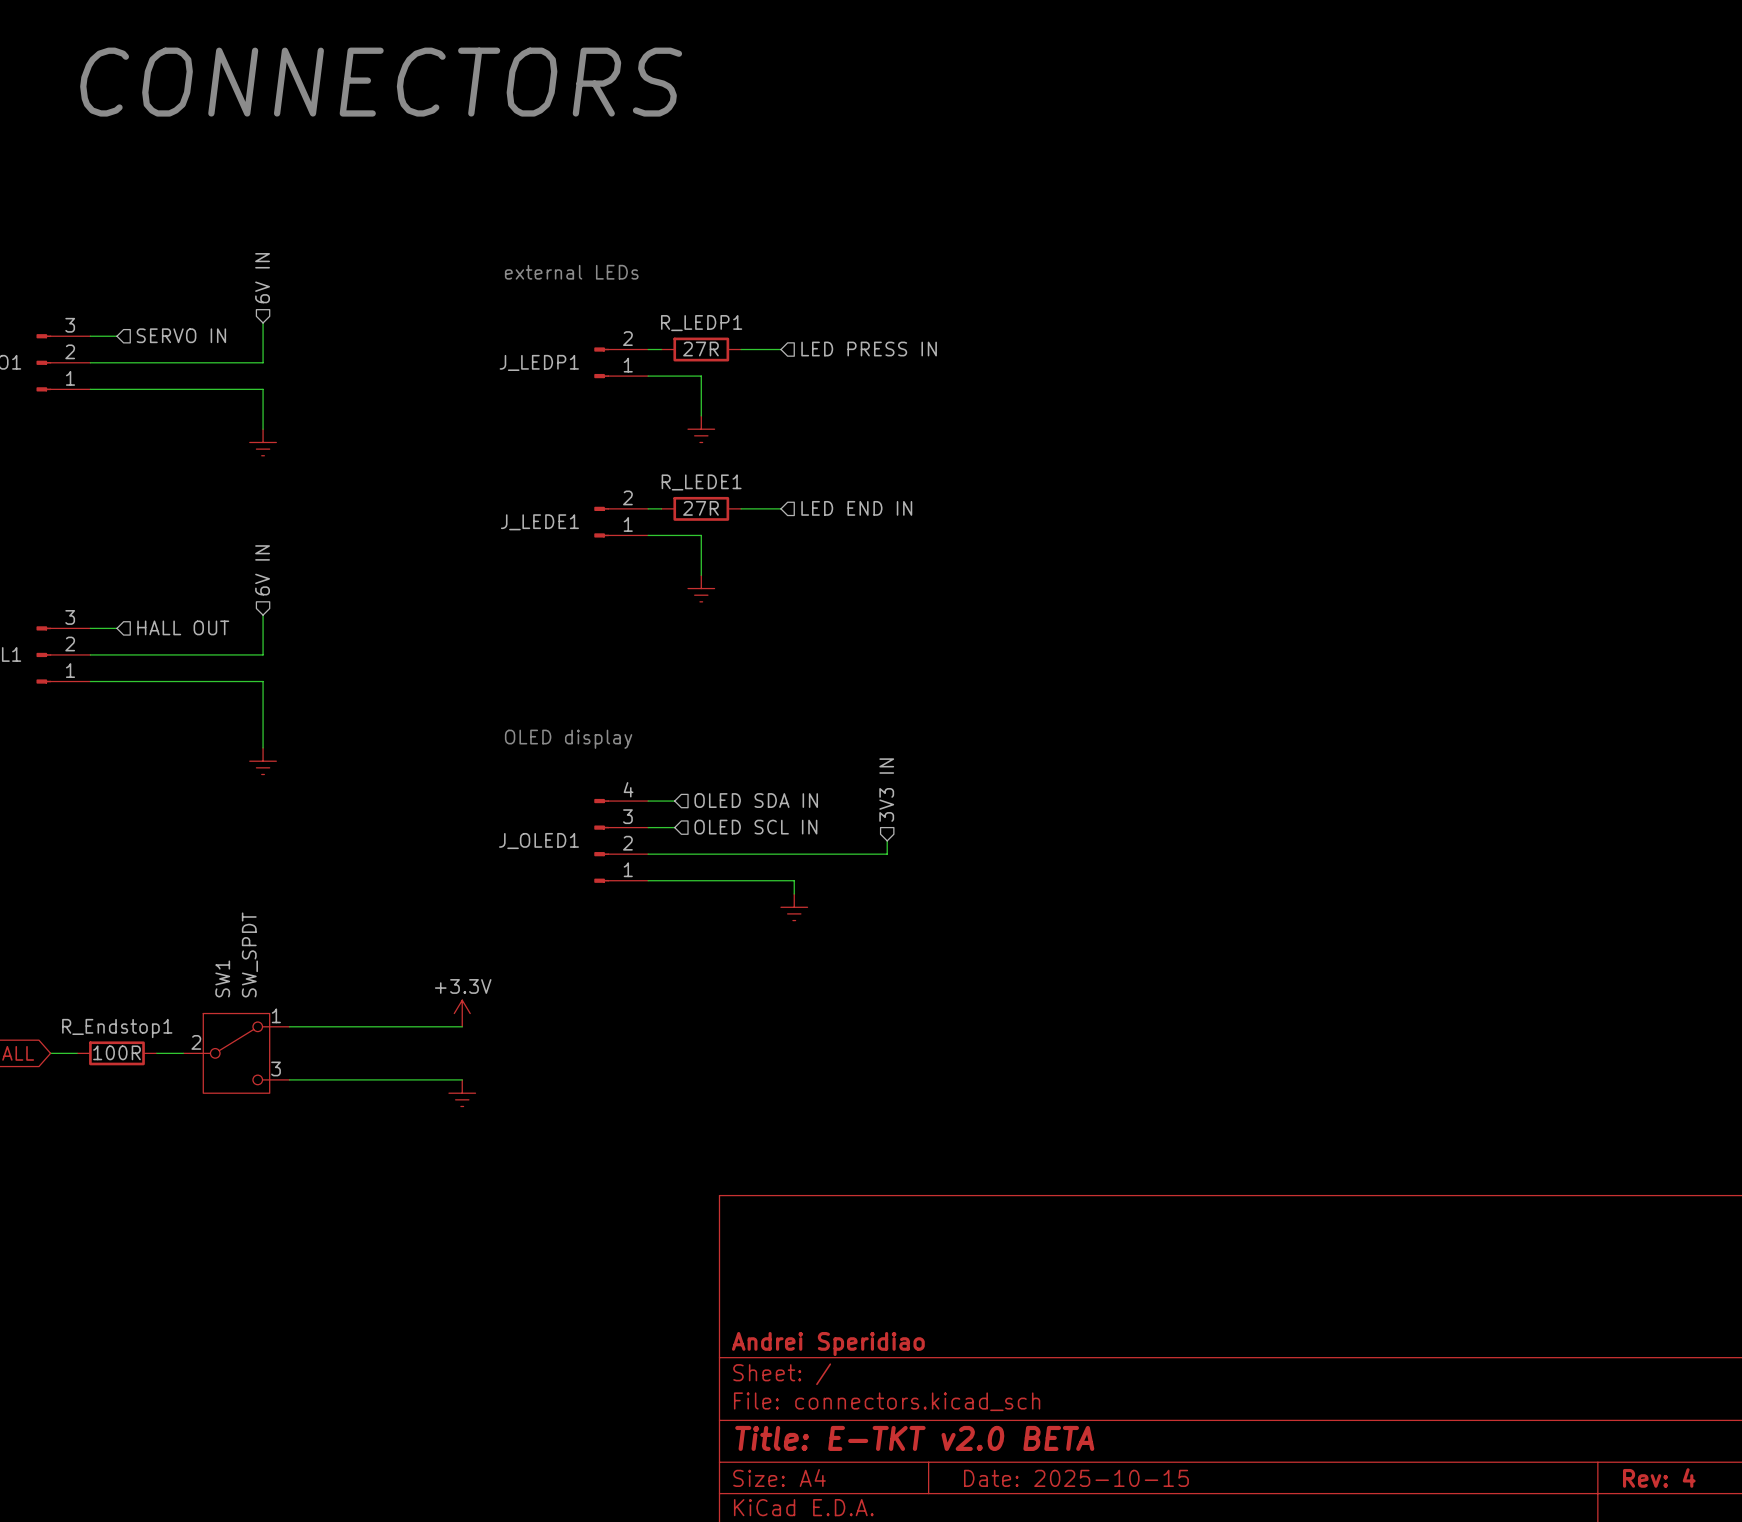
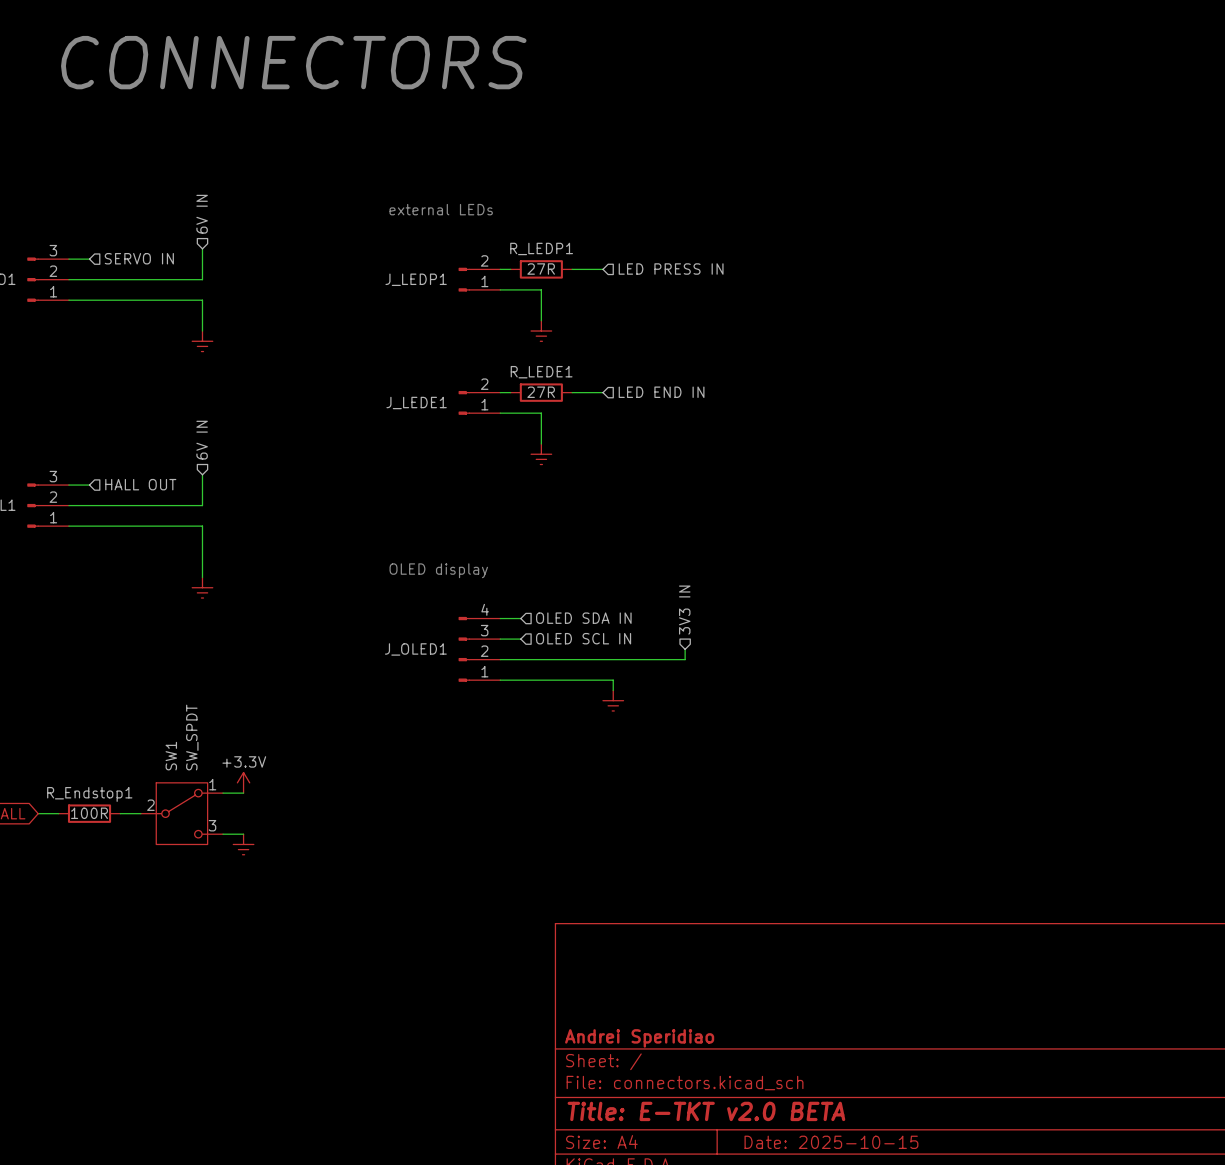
power symbol position: +3.3V (462, 1013) -> +3.3V (243, 782)
wire: (316, 1026) (462, 1026) -> none
wire: (316, 1079) (462, 1079) -> none
power symbol position: (462, 1093) -> (243, 844)

